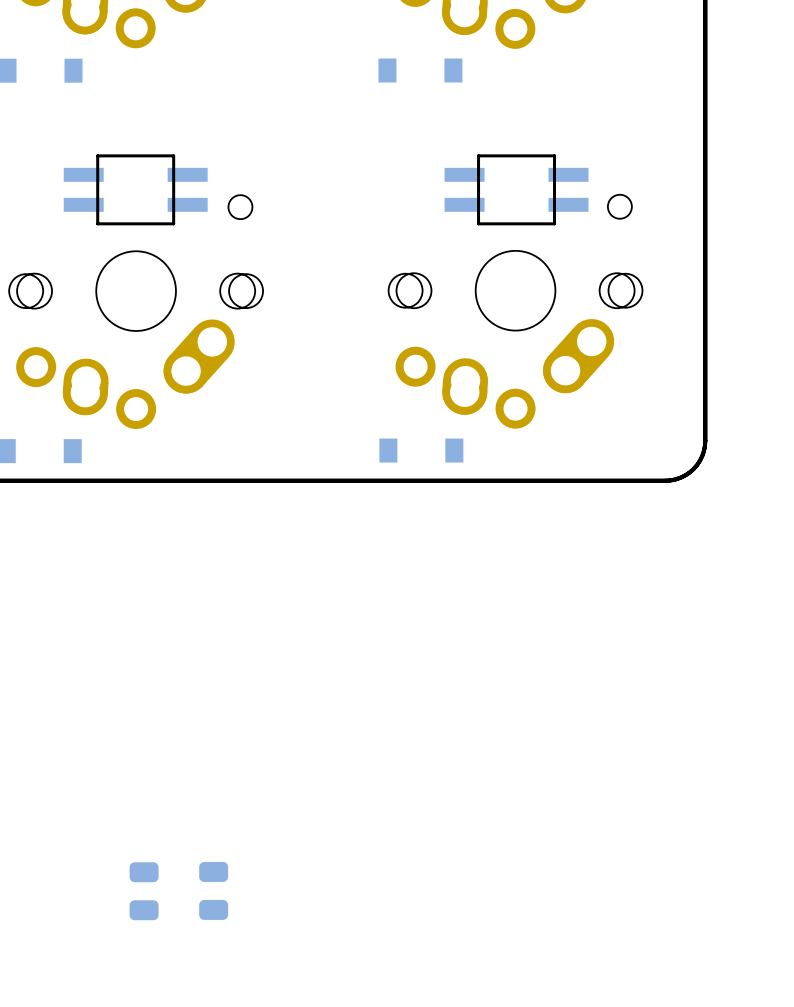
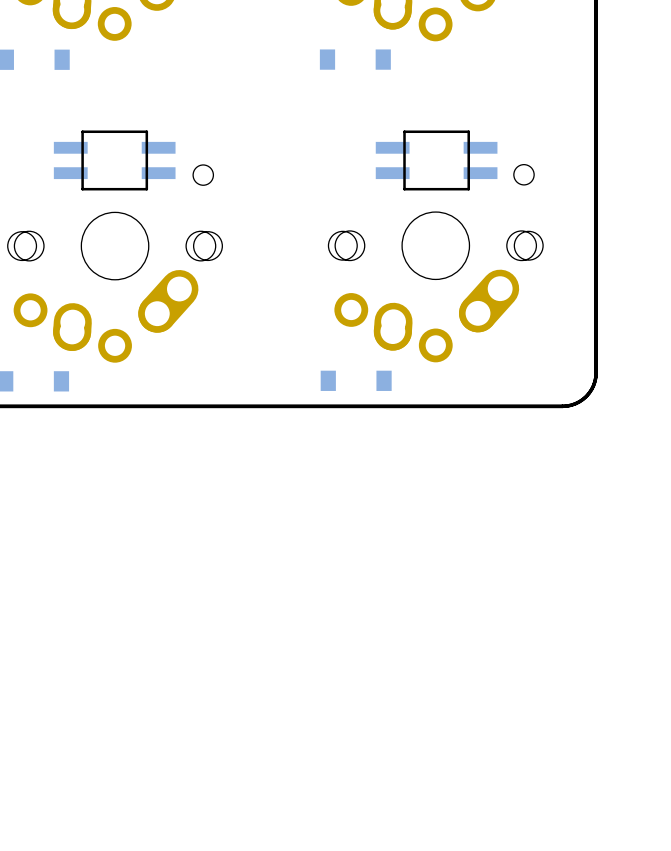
part: (213, 890) -> none
part: (144, 891) -> none

